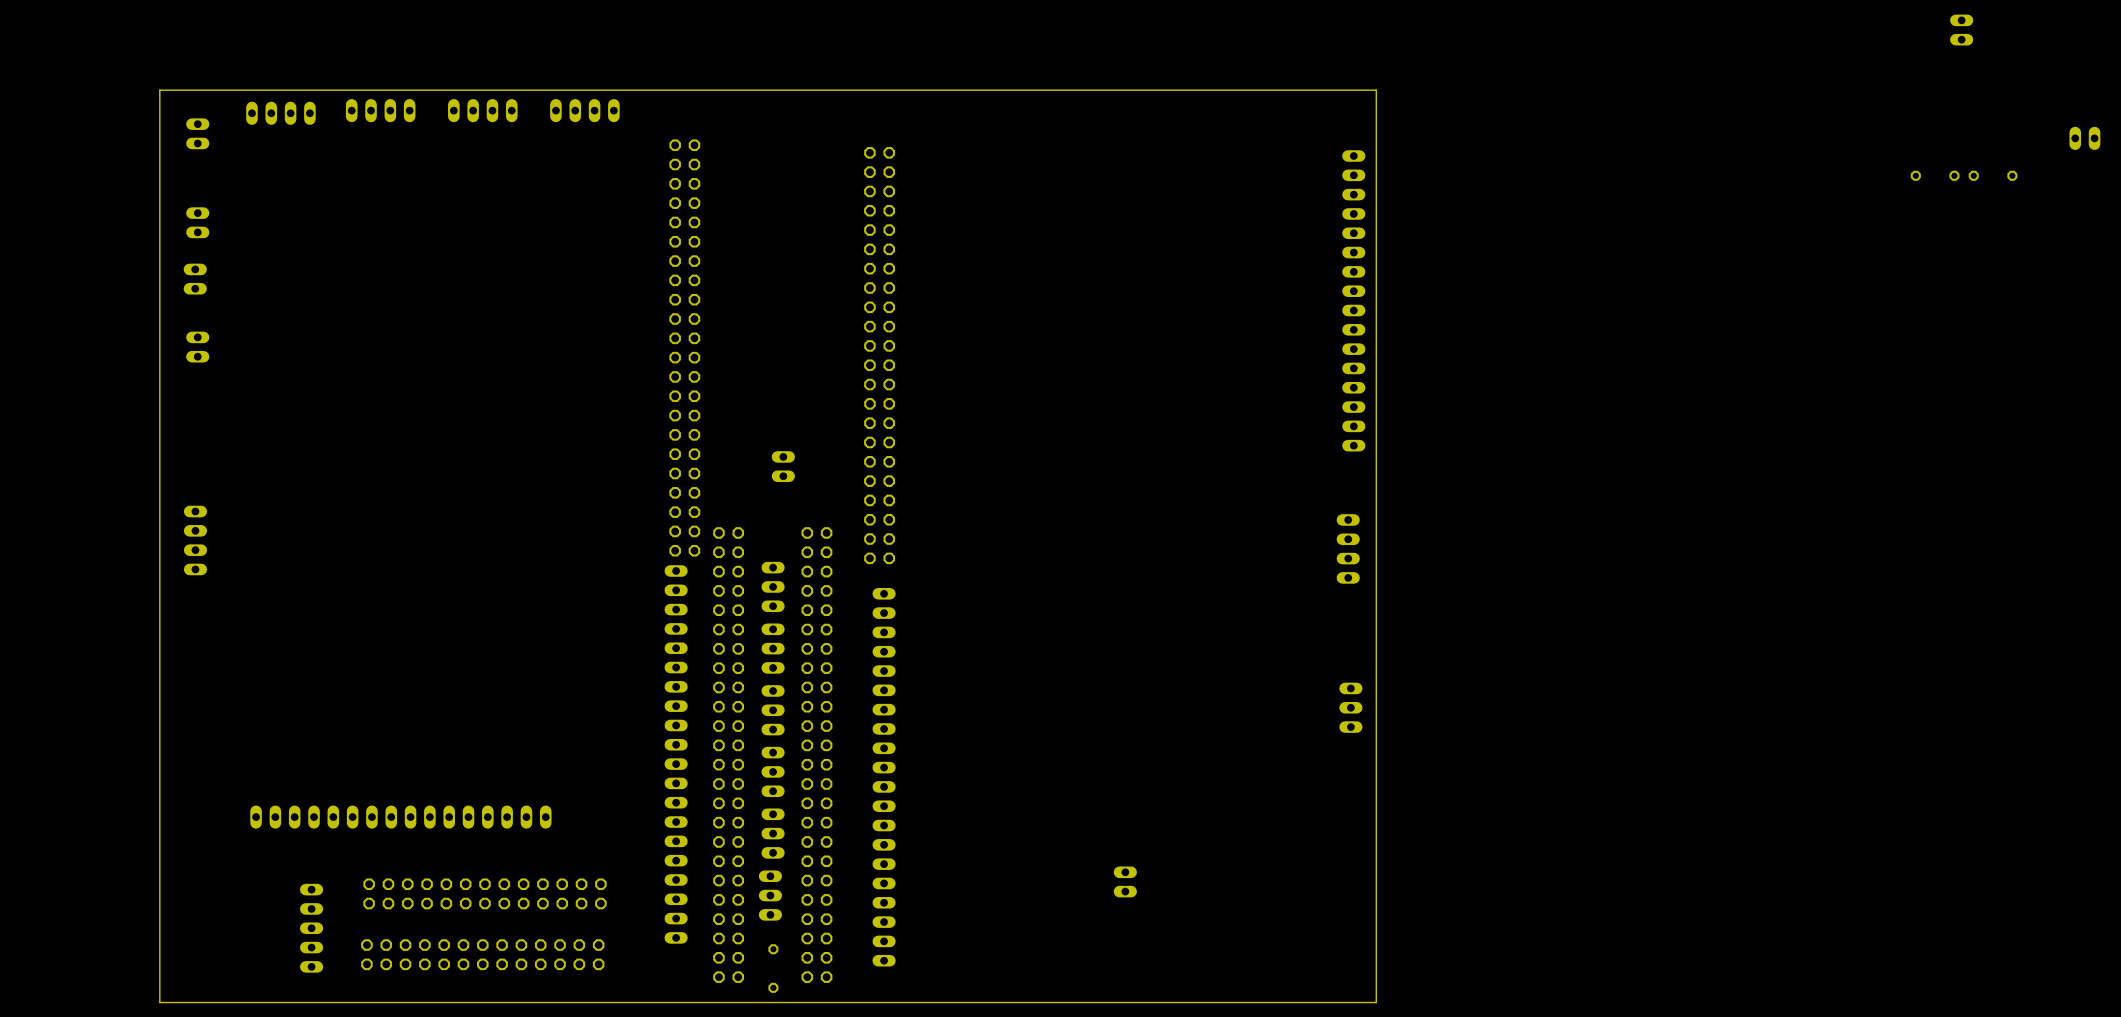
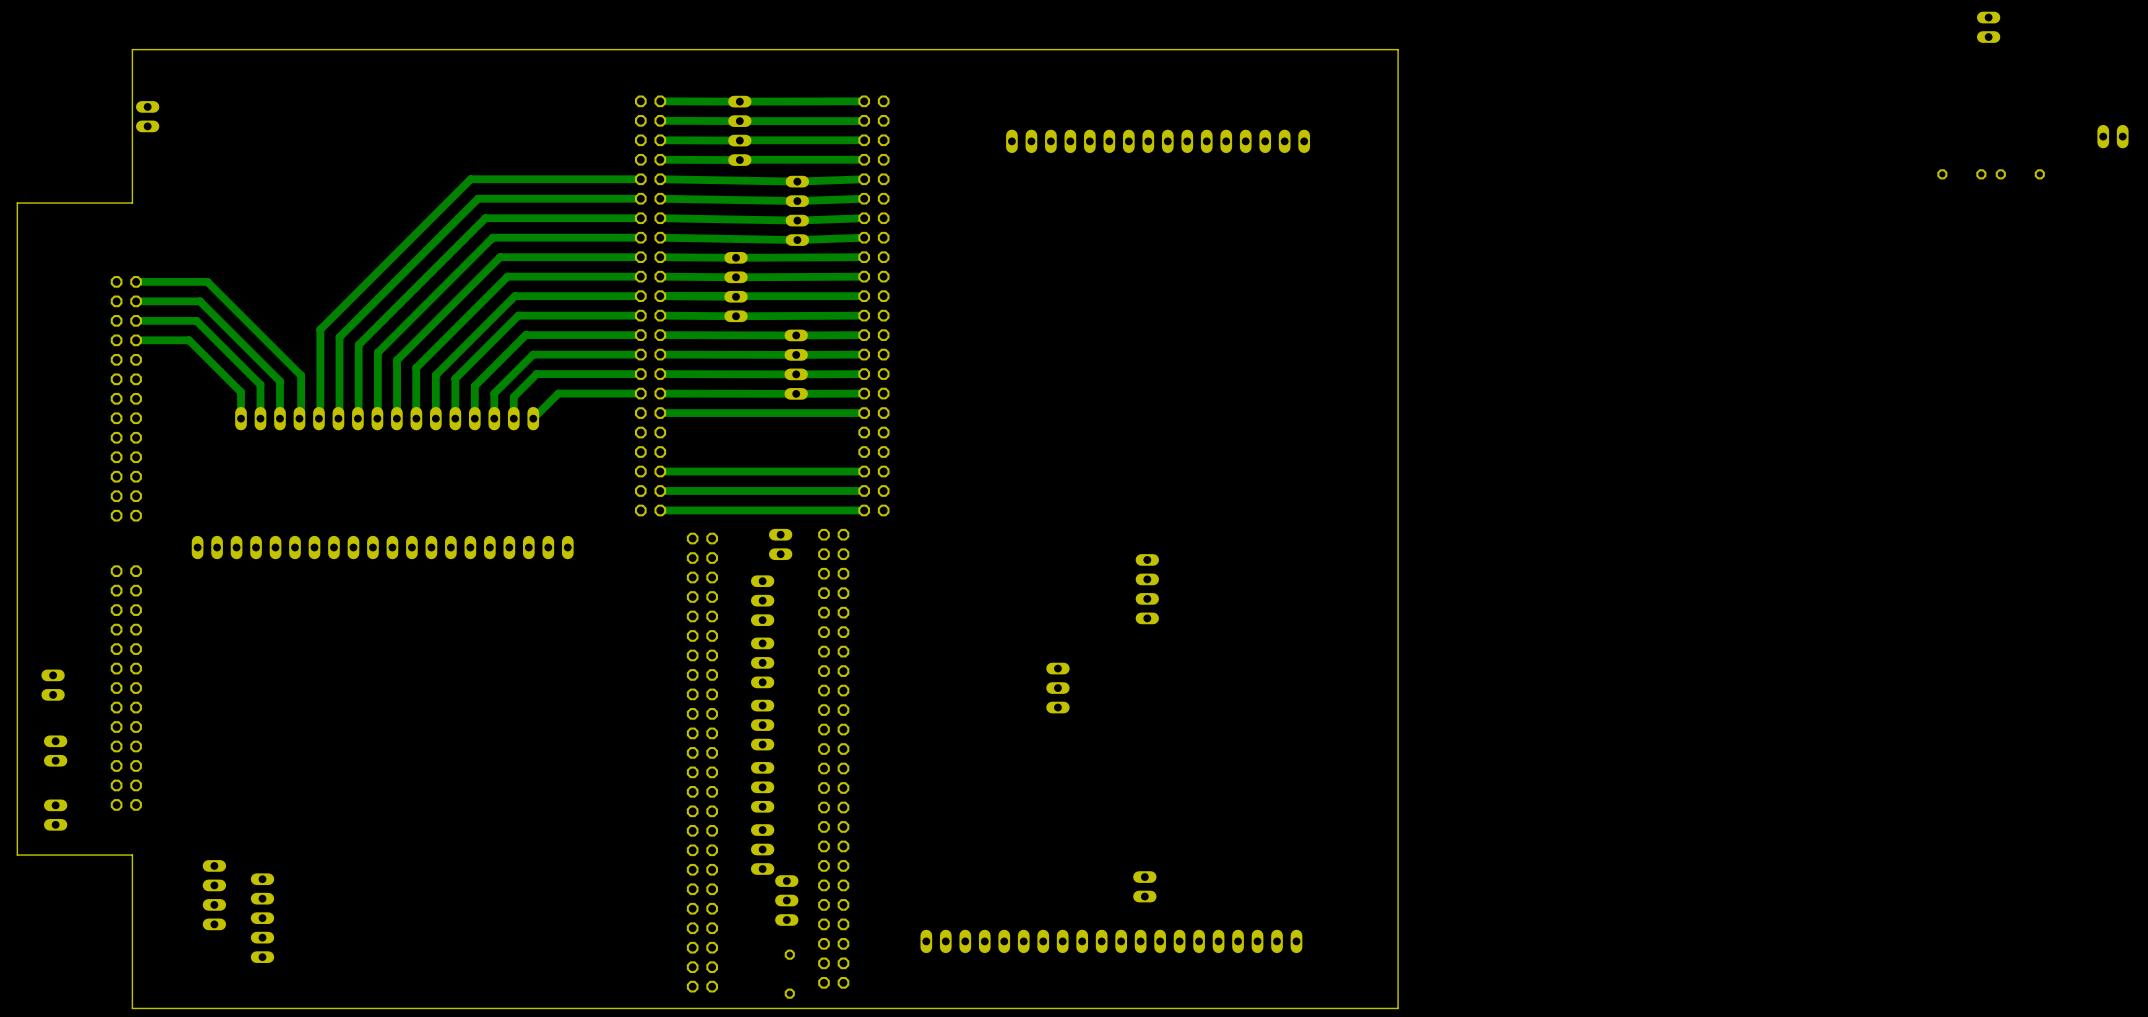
board edge: (1376, 90) (159, 90) (159, 1002) -> (1398, 87) (1398, 49) (132, 49) (132, 203) (17, 203) (17, 855) (132, 855) (132, 1008) (170, 1008)
track: none -> (864, 101) (660, 101)
part: (380, 110) -> none
part: (482, 110) -> none
part: (584, 110) -> none
part: (280, 113) -> none
part: none -> (147, 116)
track: none -> (864, 120) (660, 120)
part: none -> (739, 130)
part: (197, 133) -> none
track: none -> (660, 140) (739, 140)
track: none -> (864, 140) (737, 140)
part: none -> (1158, 141)
track: none -> (864, 159) (660, 159)
track: none -> (640, 179) (470, 179) (320, 329) (318, 418)
track: none -> (864, 179) (797, 181) (660, 179)
track: none -> (640, 198) (478, 198) (339, 337) (338, 418)
track: none -> (864, 198) (797, 201) (660, 198)
part: none -> (797, 210)
track: none -> (640, 218) (485, 218) (358, 344) (357, 418)
track: none -> (864, 218) (797, 220) (660, 218)
part: (197, 222) -> none
track: none -> (640, 237) (492, 237) (377, 352) (377, 418)
track: none -> (864, 237) (797, 240) (660, 237)
track: none -> (640, 257) (500, 257) (397, 360) (396, 418)
track: none -> (864, 257) (660, 257)
track: none -> (640, 276) (507, 276) (416, 367) (416, 418)
track: none -> (864, 276) (660, 276)
part: (195, 279) -> none
track: none -> (136, 281) (207, 281) (301, 375) (301, 416) (299, 418)
part: none -> (736, 287)
track: none -> (640, 296) (514, 296) (435, 375) (435, 418)
track: none -> (864, 296) (660, 296) (736, 296)
part: (1353, 300) -> none
track: none -> (136, 301) (200, 301) (279, 381) (279, 418)
track: none -> (640, 315) (518, 315) (455, 378) (455, 418)
track: none -> (864, 315) (660, 315)
track: none -> (136, 320) (196, 320) (260, 384) (260, 418)
track: none -> (640, 335) (525, 335) (474, 386) (474, 418)
track: none -> (864, 335) (660, 335)
track: none -> (136, 340) (189, 340) (241, 392) (241, 418)
part: (197, 347) -> none
part position: (684, 347) -> (650, 305)
track: none -> (640, 354) (533, 354) (494, 393) (494, 418)
track: none -> (864, 354) (660, 354)
part position: (879, 355) -> (873, 305)
part: none -> (796, 364)
track: none -> (640, 374) (536, 374) (513, 396) (513, 418)
track: none -> (864, 374) (660, 374)
track: none -> (640, 393) (558, 393) (533, 418)
track: none -> (864, 393) (660, 393)
part: none -> (126, 398)
track: none -> (864, 413) (660, 413)
part: none -> (387, 418)
part position: (783, 466) -> (780, 544)
track: none -> (864, 471) (660, 471)
track: none -> (864, 490) (660, 490)
track: none -> (864, 510) (660, 510)
part: (195, 540) -> none
part: none -> (382, 547)
part: (1348, 548) -> none
part: (773, 586) -> none
part: none -> (1147, 589)
part: none -> (762, 600)
part: (773, 648) -> none
part: none -> (762, 662)
part: none -> (53, 685)
part: none -> (126, 688)
part: none -> (1057, 688)
part: (1350, 707) -> none
part: (773, 710) -> none
part: none -> (762, 725)
part: none -> (55, 751)
part: (676, 754) -> none
part position: (728, 755) -> (702, 762)
part: (773, 771) -> none
part: (884, 777) -> none
part: none -> (762, 787)
part: none -> (55, 815)
part: (400, 817) -> none
part: (773, 833) -> none
part: none -> (762, 849)
part: none -> (214, 895)
part: (485, 893) -> none
part position: (311, 928) -> (262, 918)
part: none -> (1111, 941)
part: (482, 954) -> none

